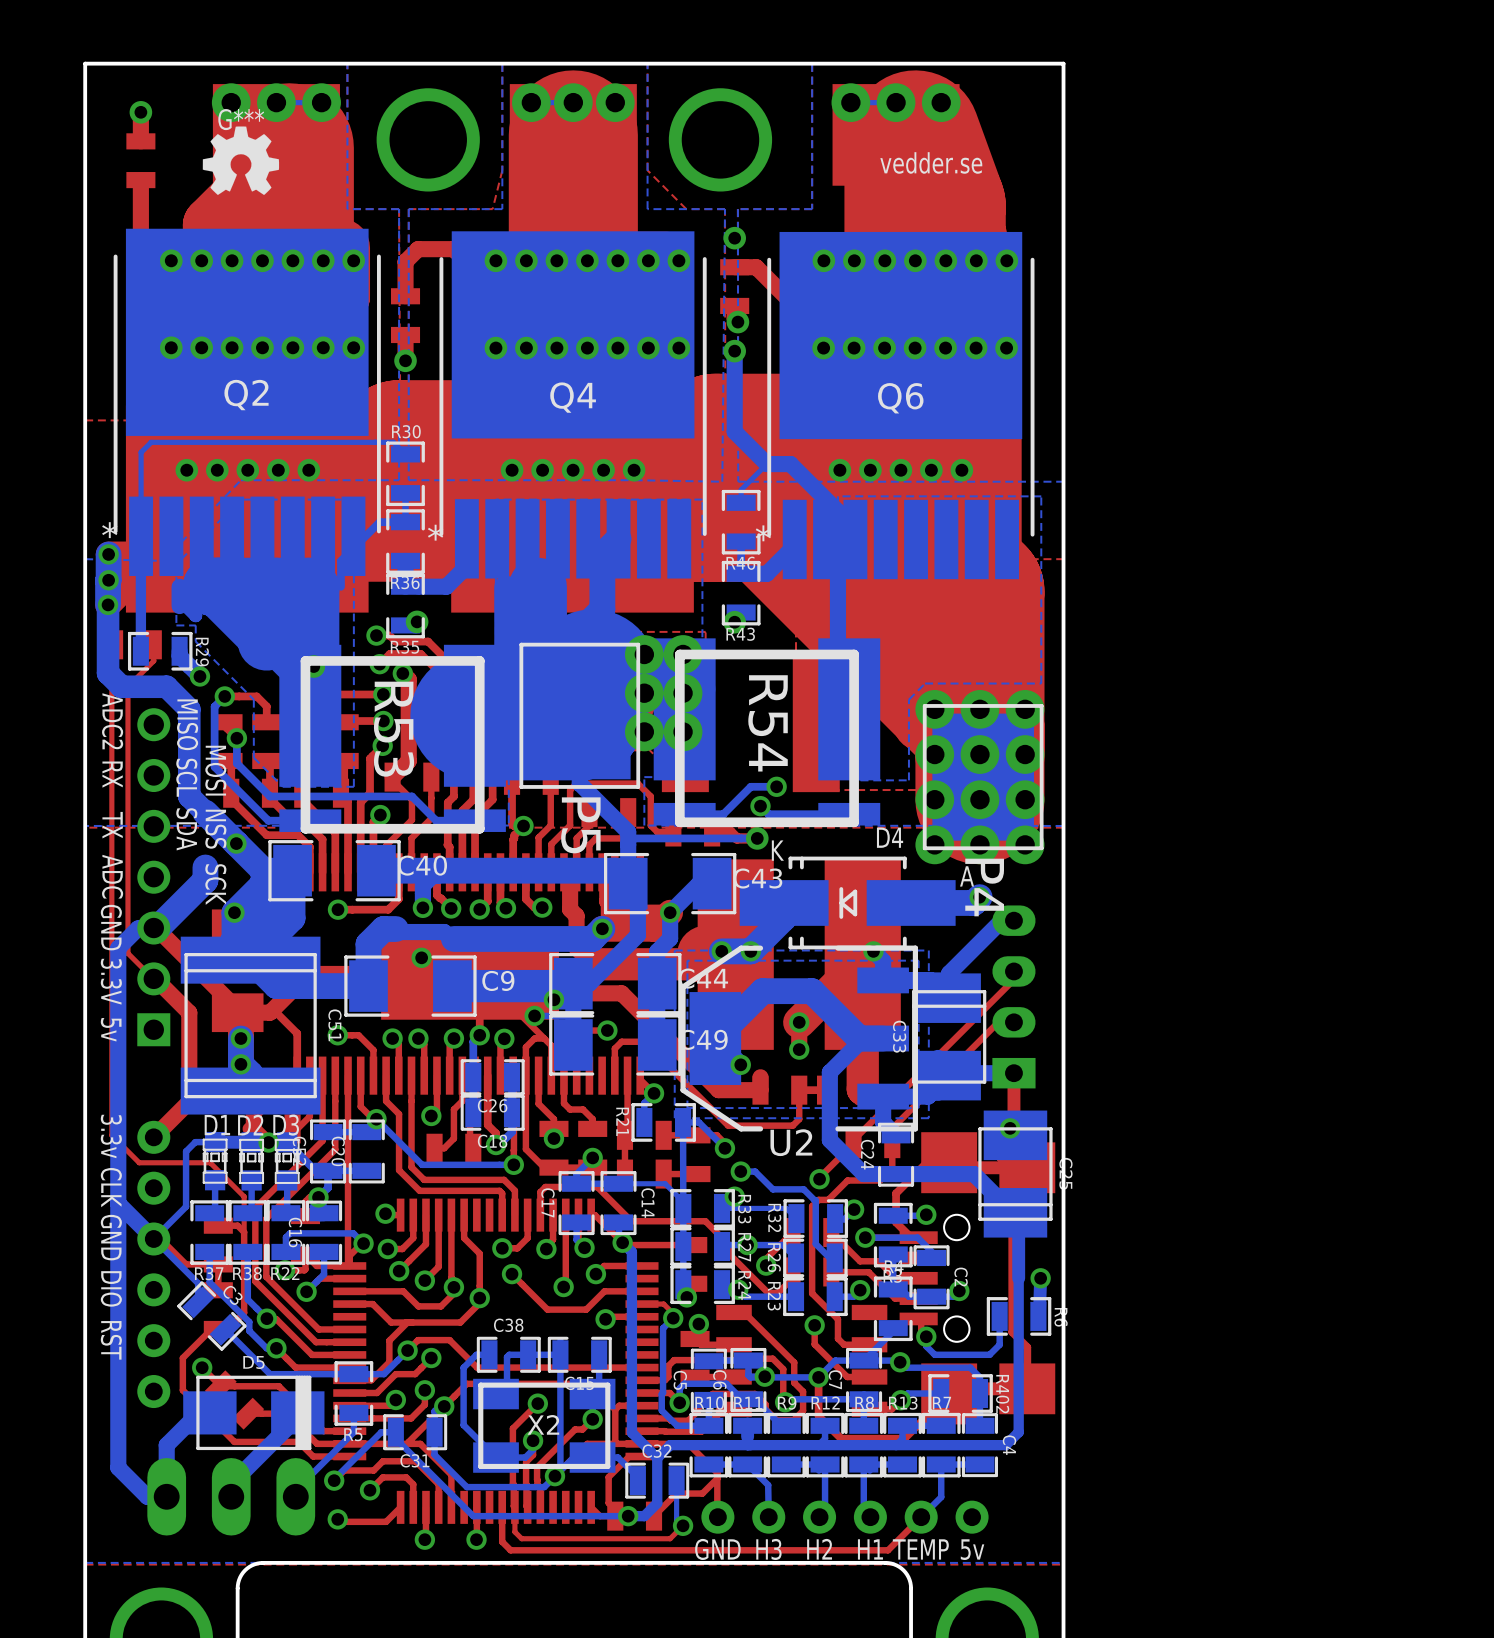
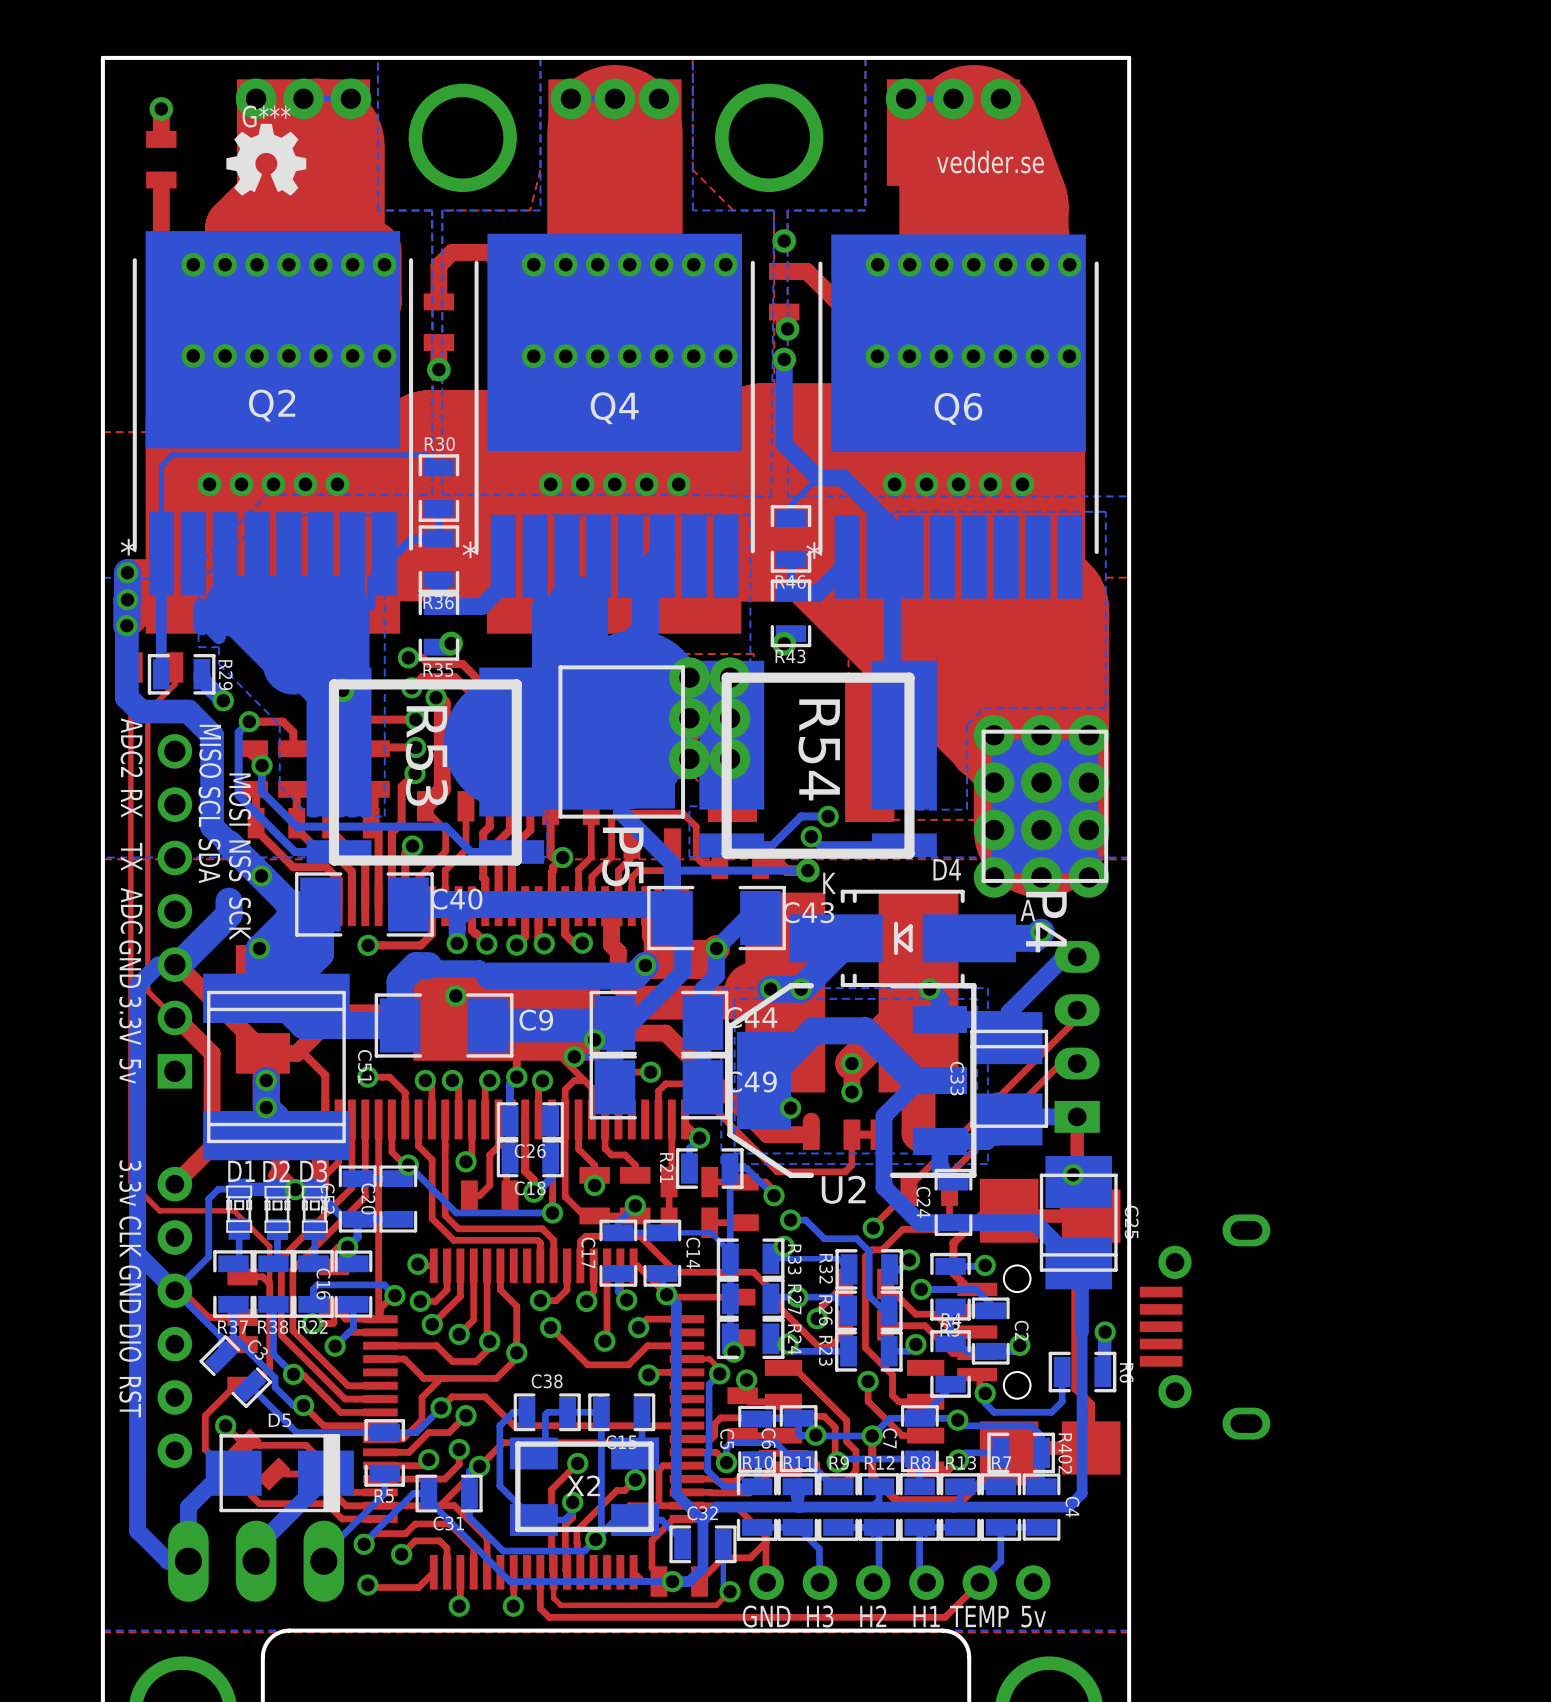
part: none -> (1205, 1326)

